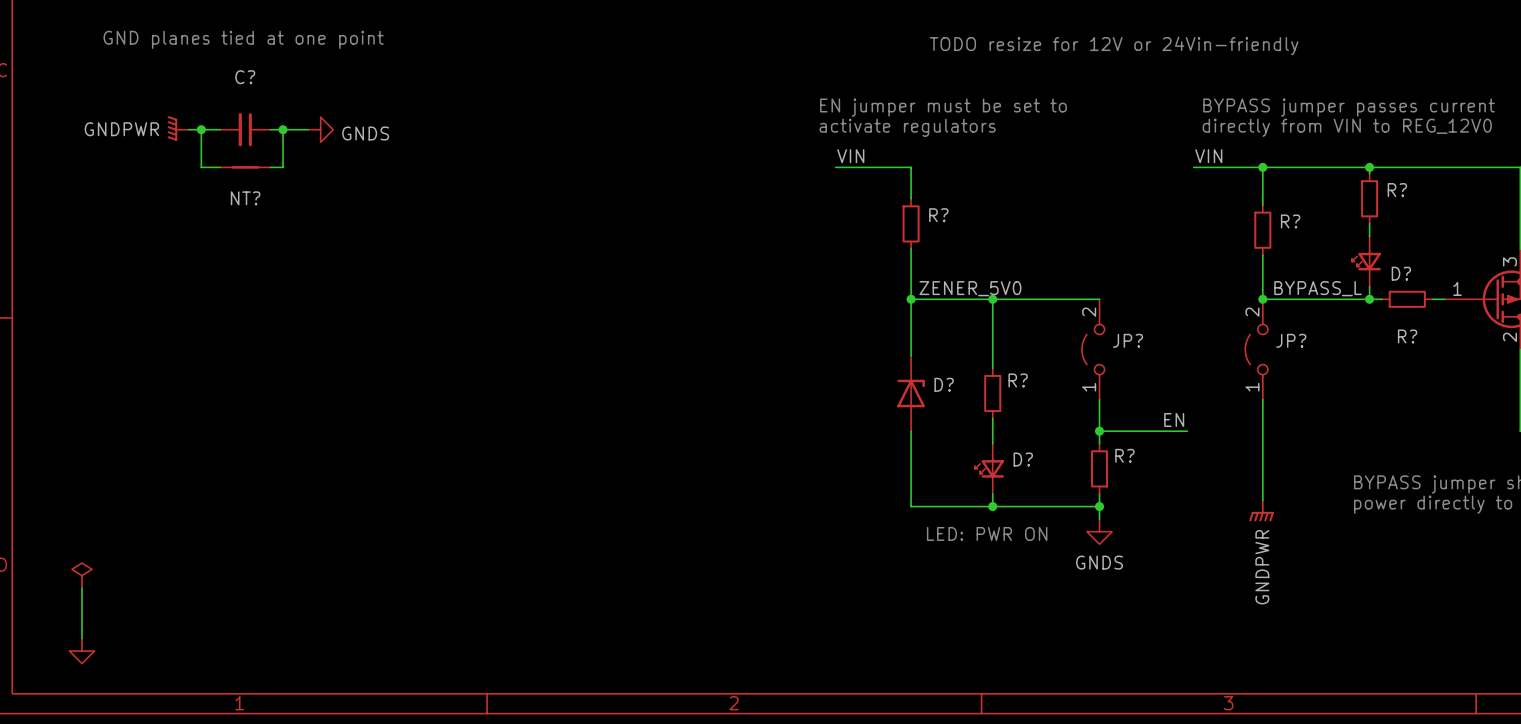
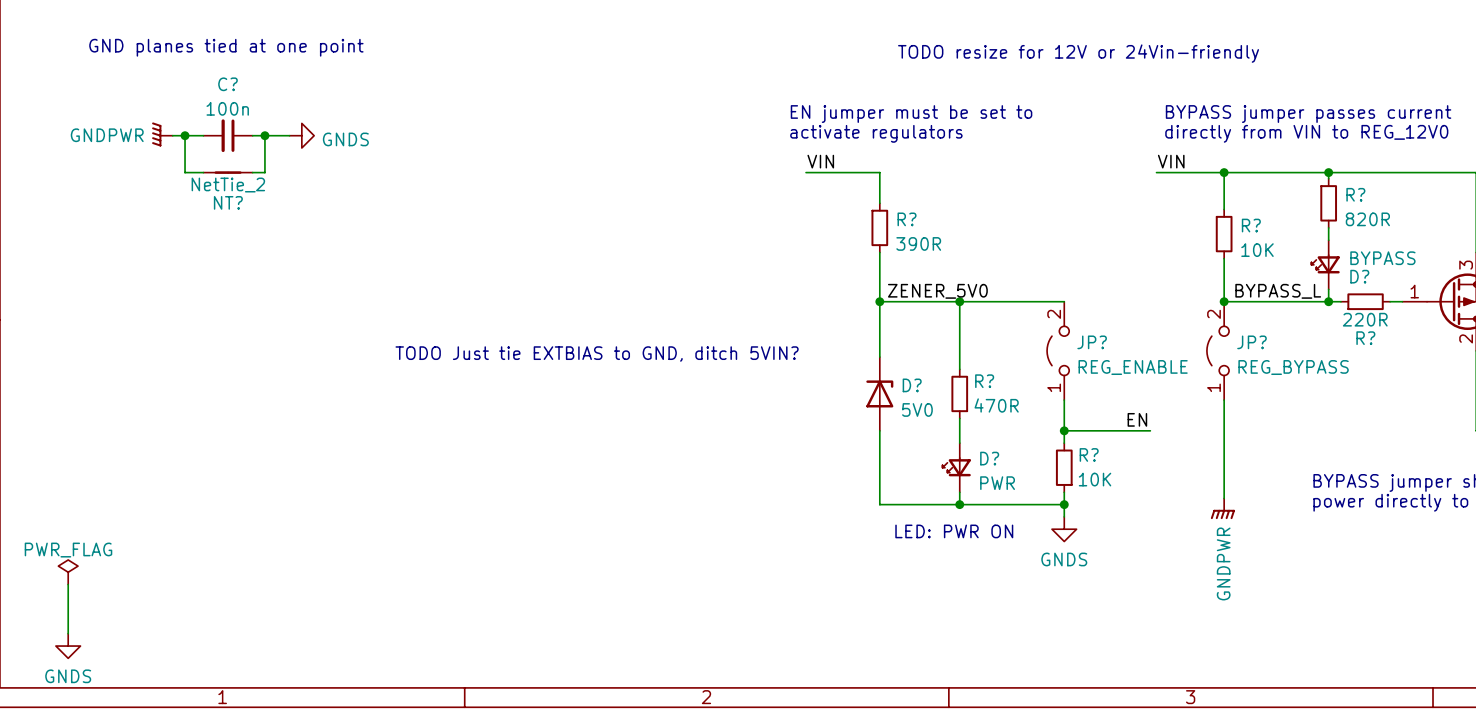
C? value: none -> 100n (227, 108)
NT? value: none -> NetTie_2 (228, 185)
R? value: none -> 820R (1367, 219)
R? value: none -> 390R (918, 243)
R? value: none -> 10K (1257, 250)
D? value: none -> BYPASS (1382, 258)
R? value: none -> 220R (1365, 319)
text: none -> TODO Just tie EXTBIAS to GND, ditch 5VIN? (597, 354)
JP? value: none -> REG_ENABLE (1133, 367)
JP? value: none -> REG_BYPASS (1293, 367)
R? value: none -> 470R (996, 405)
D? value: none -> 5V0 (917, 409)
R? value: none -> 10K (1095, 479)
D? value: none -> PWR (997, 483)
power symbol text: none -> PWR_FLAG (68, 550)
power symbol text: none -> GNDS (68, 676)

